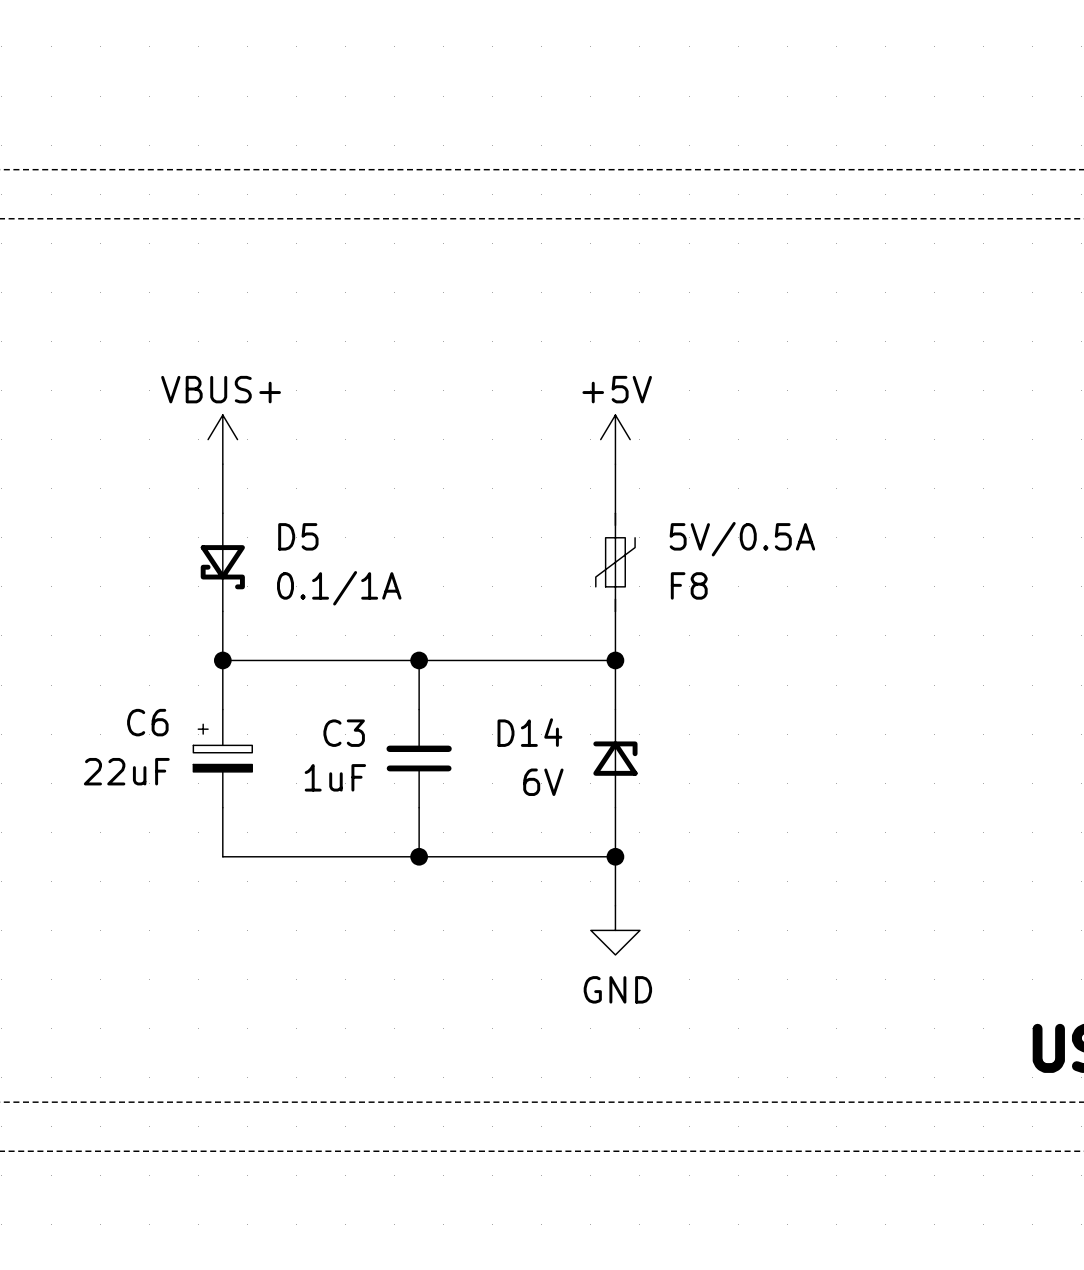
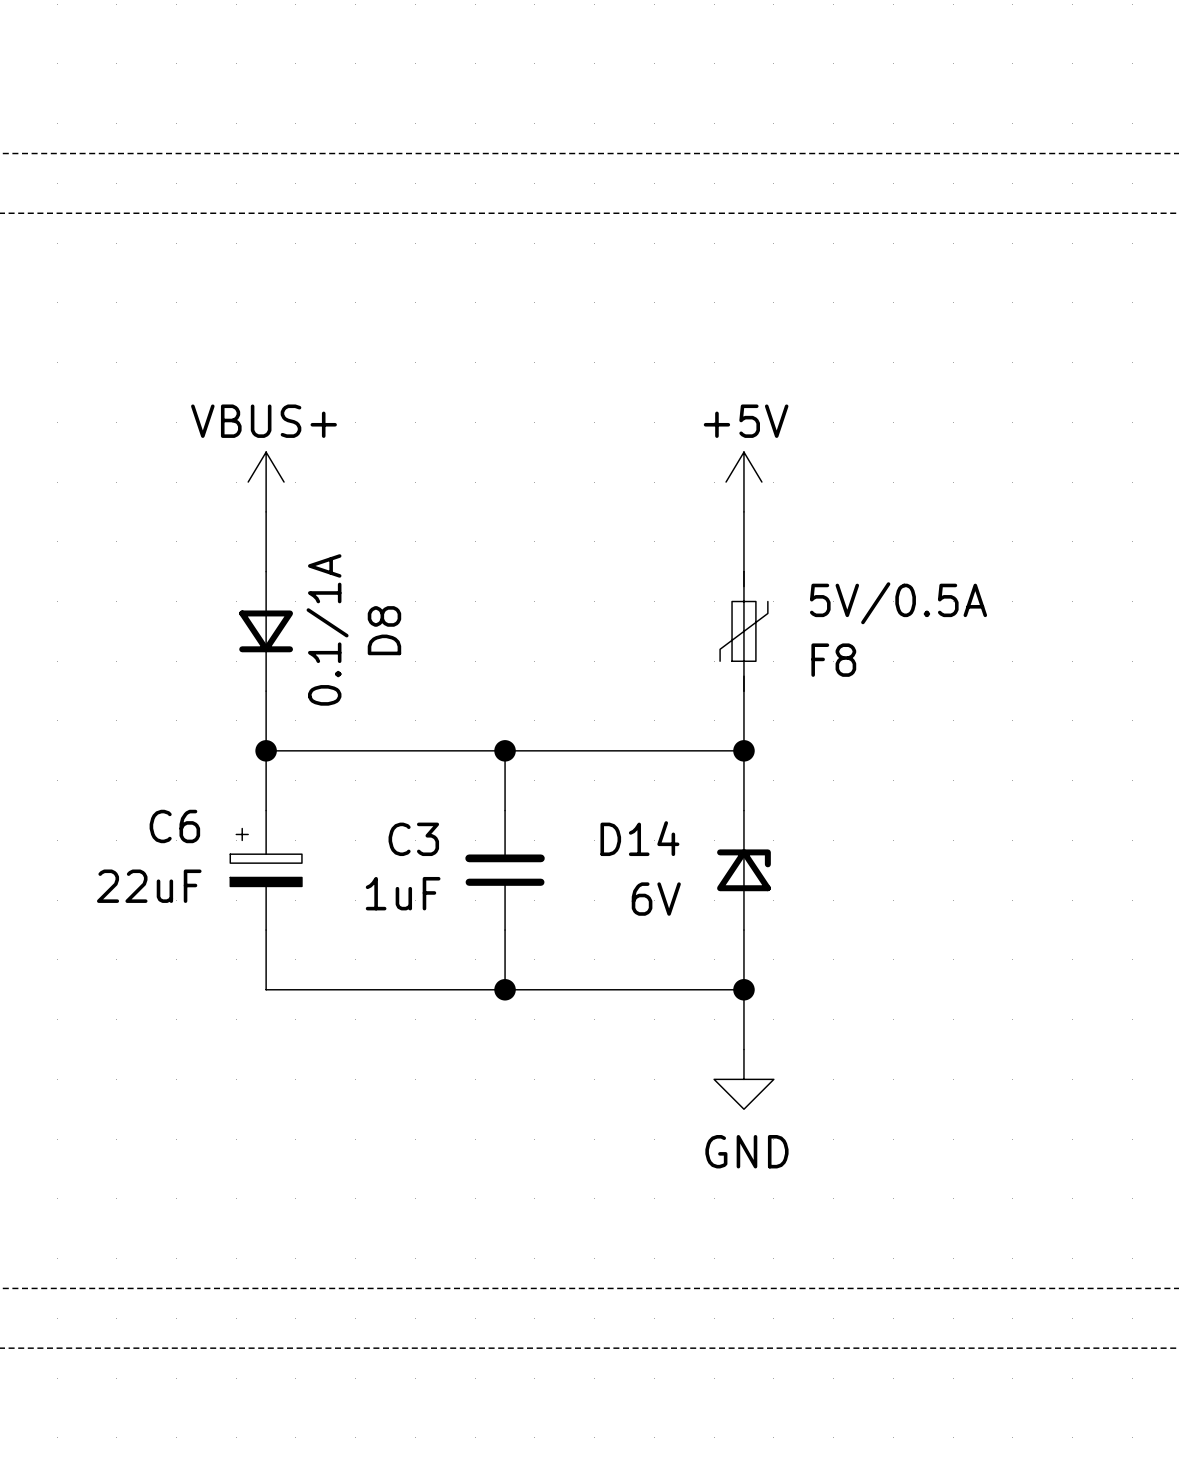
D5: 0.1/1A (222, 562) -> none
D8: none -> 0.1/1A (266, 631)

